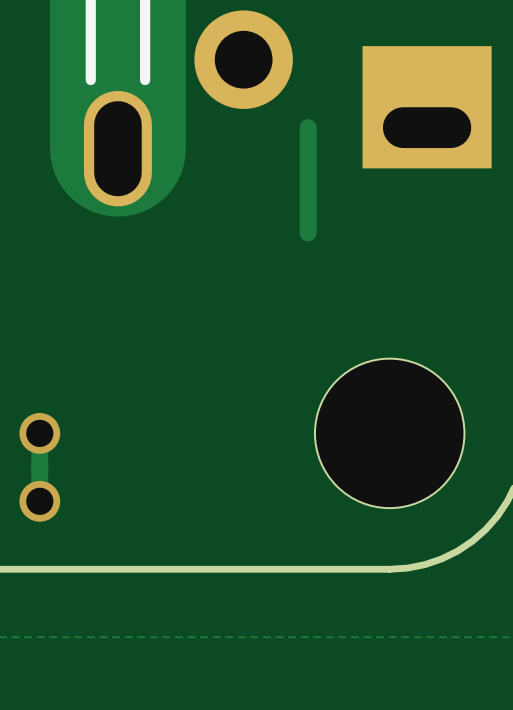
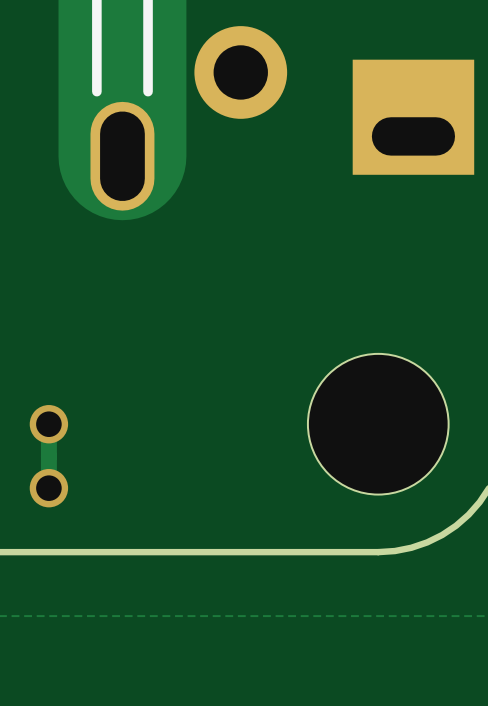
track: (308, 127) (308, 232) -> none

